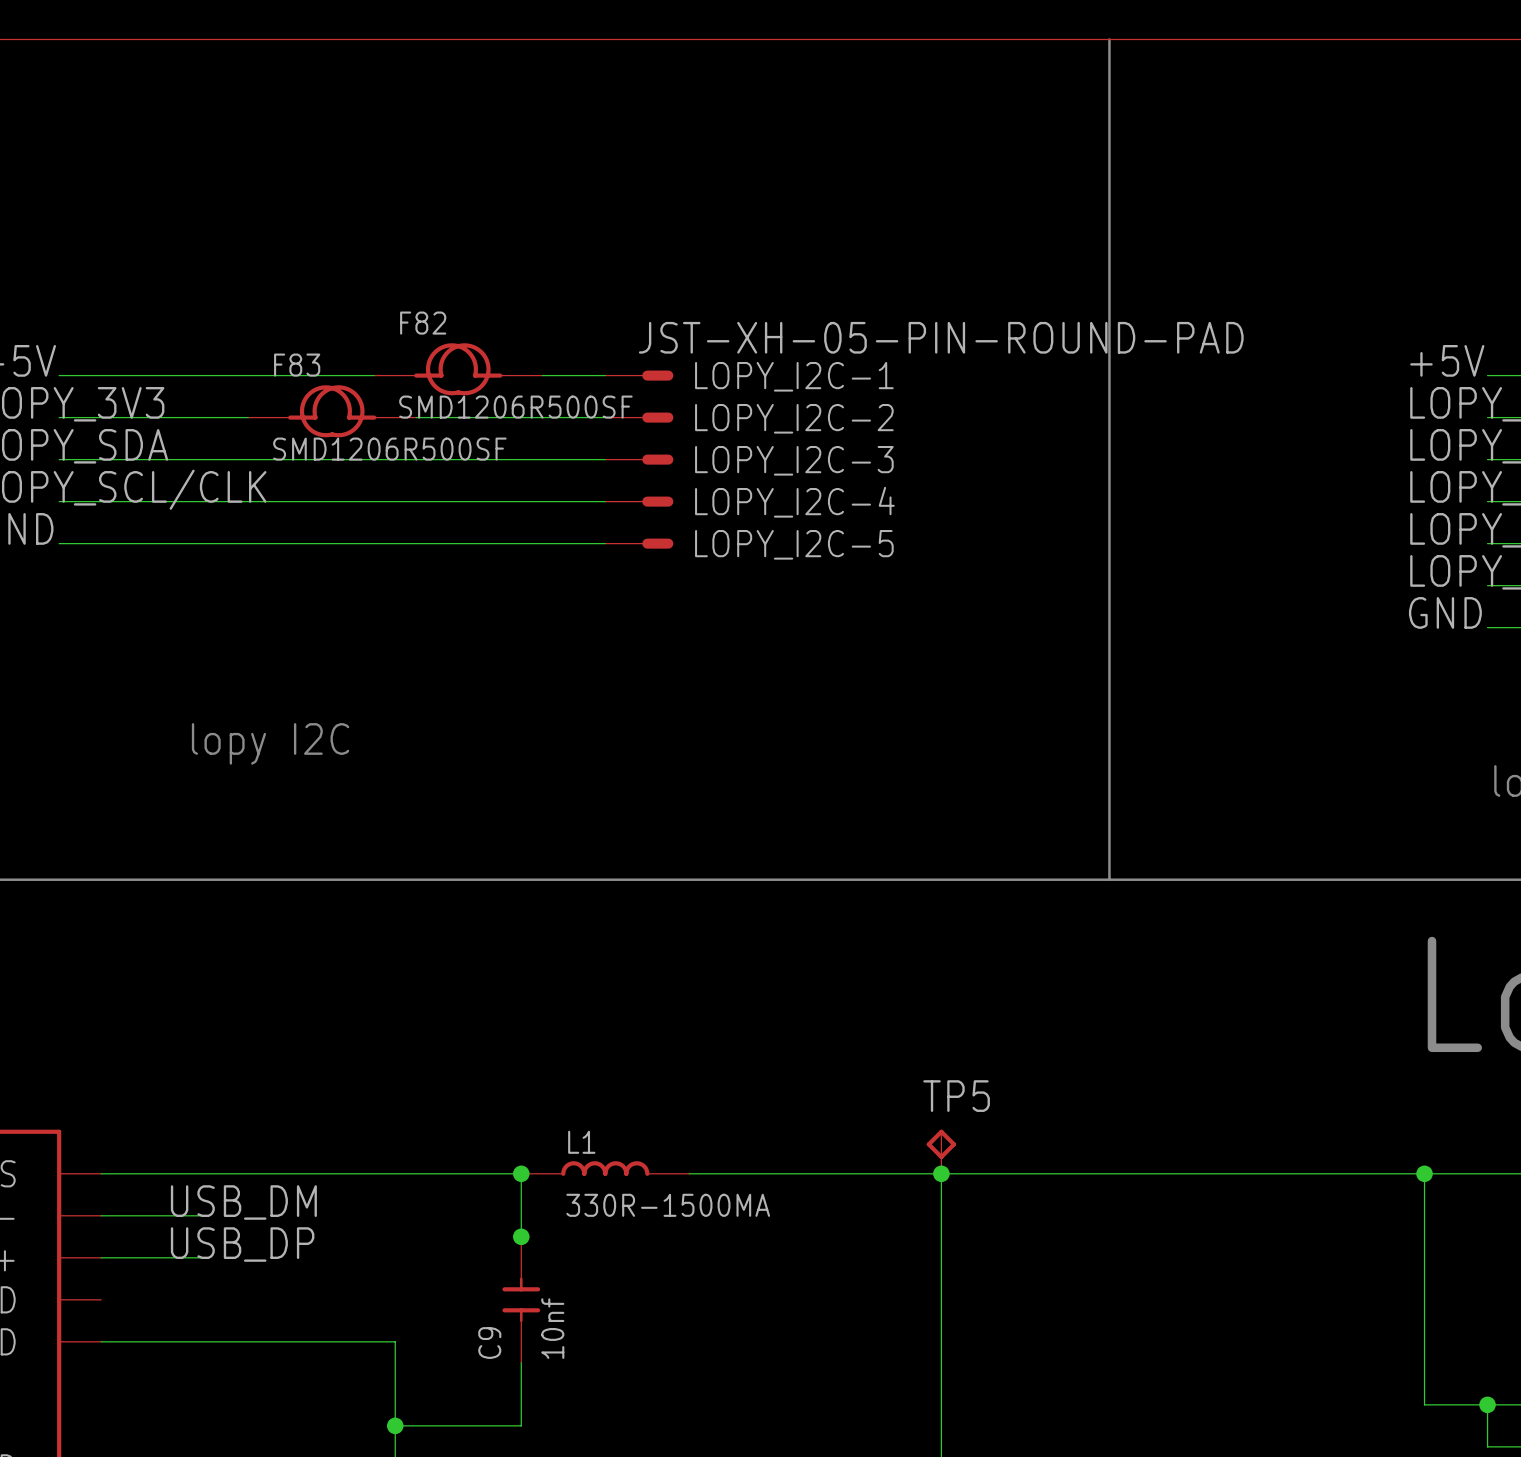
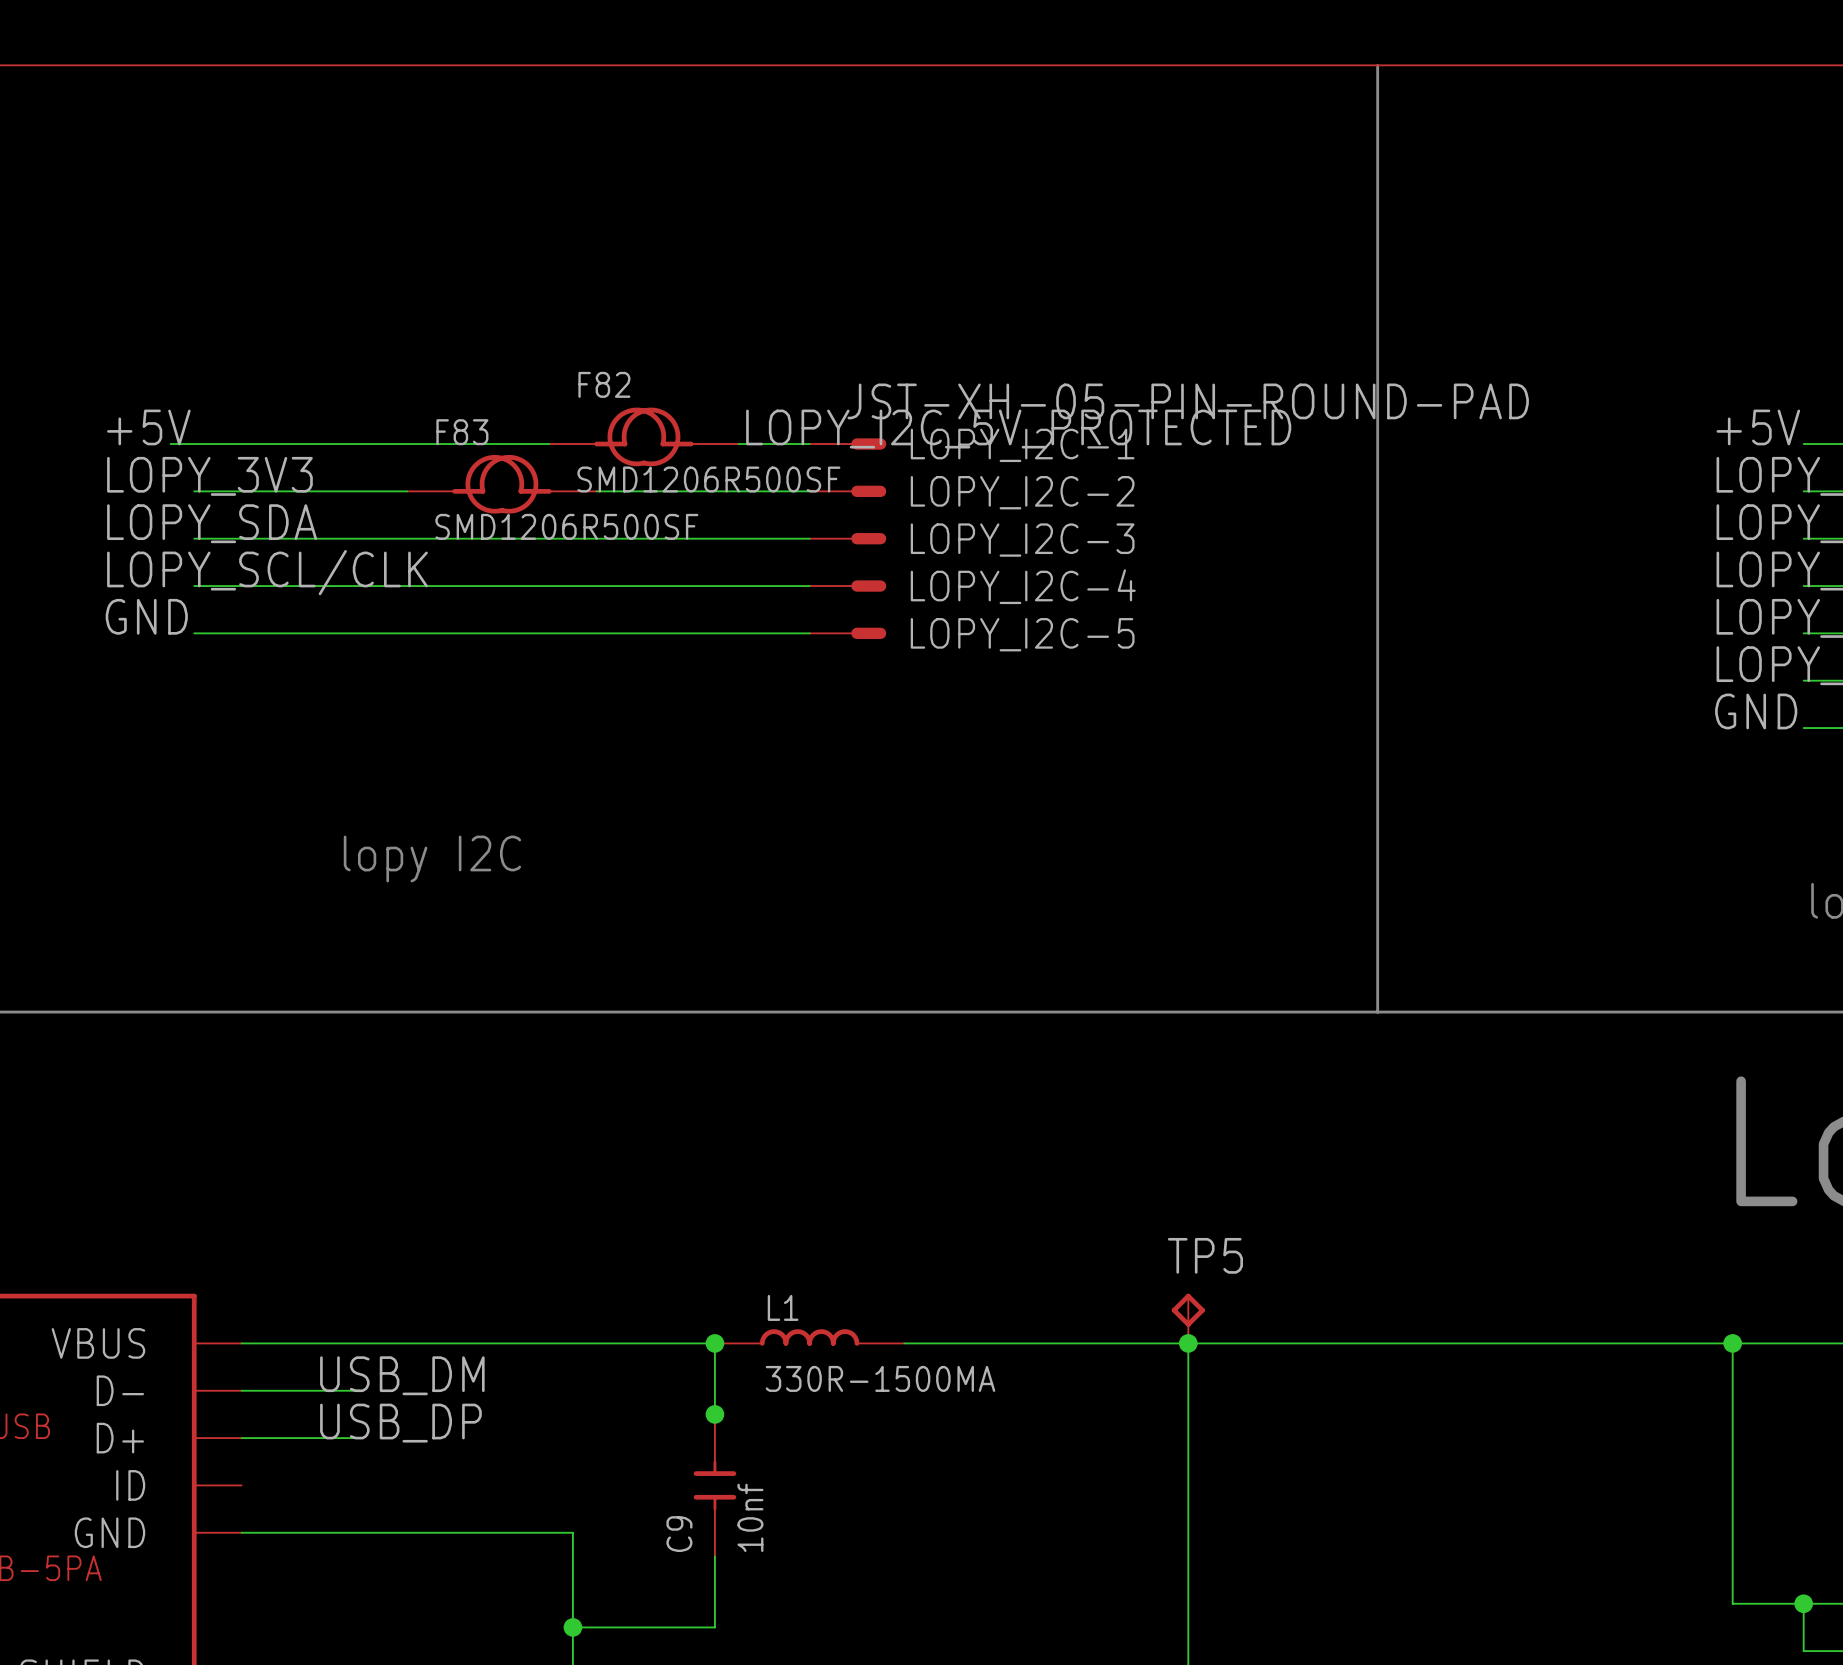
label: none -> LOPY_I2C_5V_PROTECTED (1018, 429)
wire: none -> (170, 444) (194, 444)

